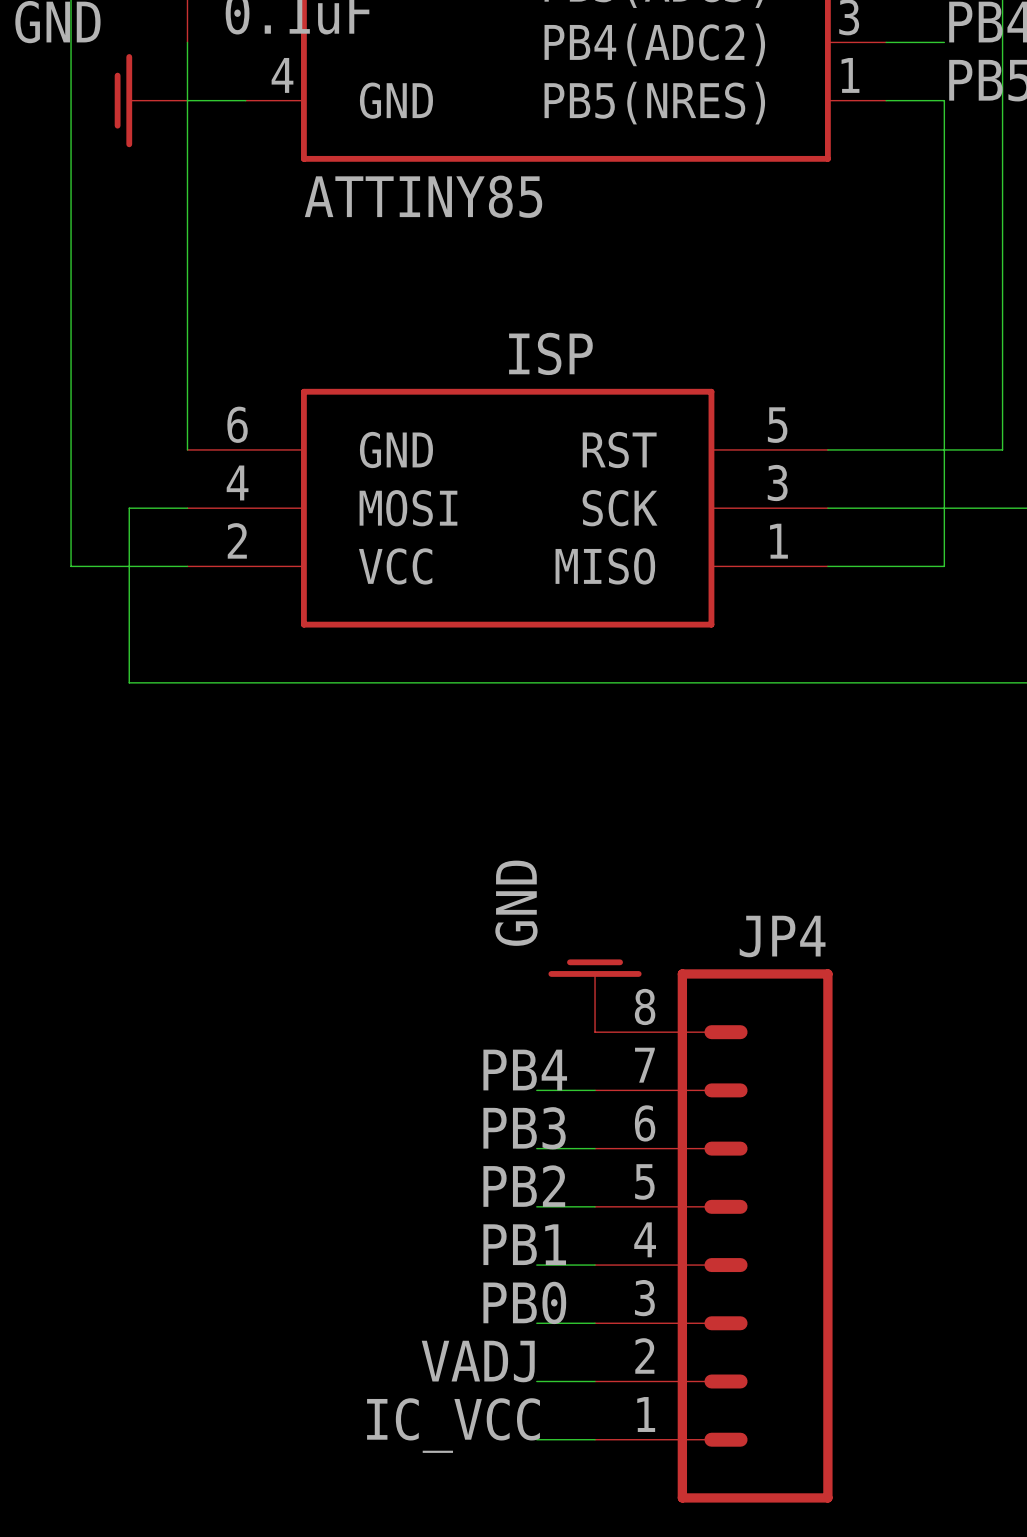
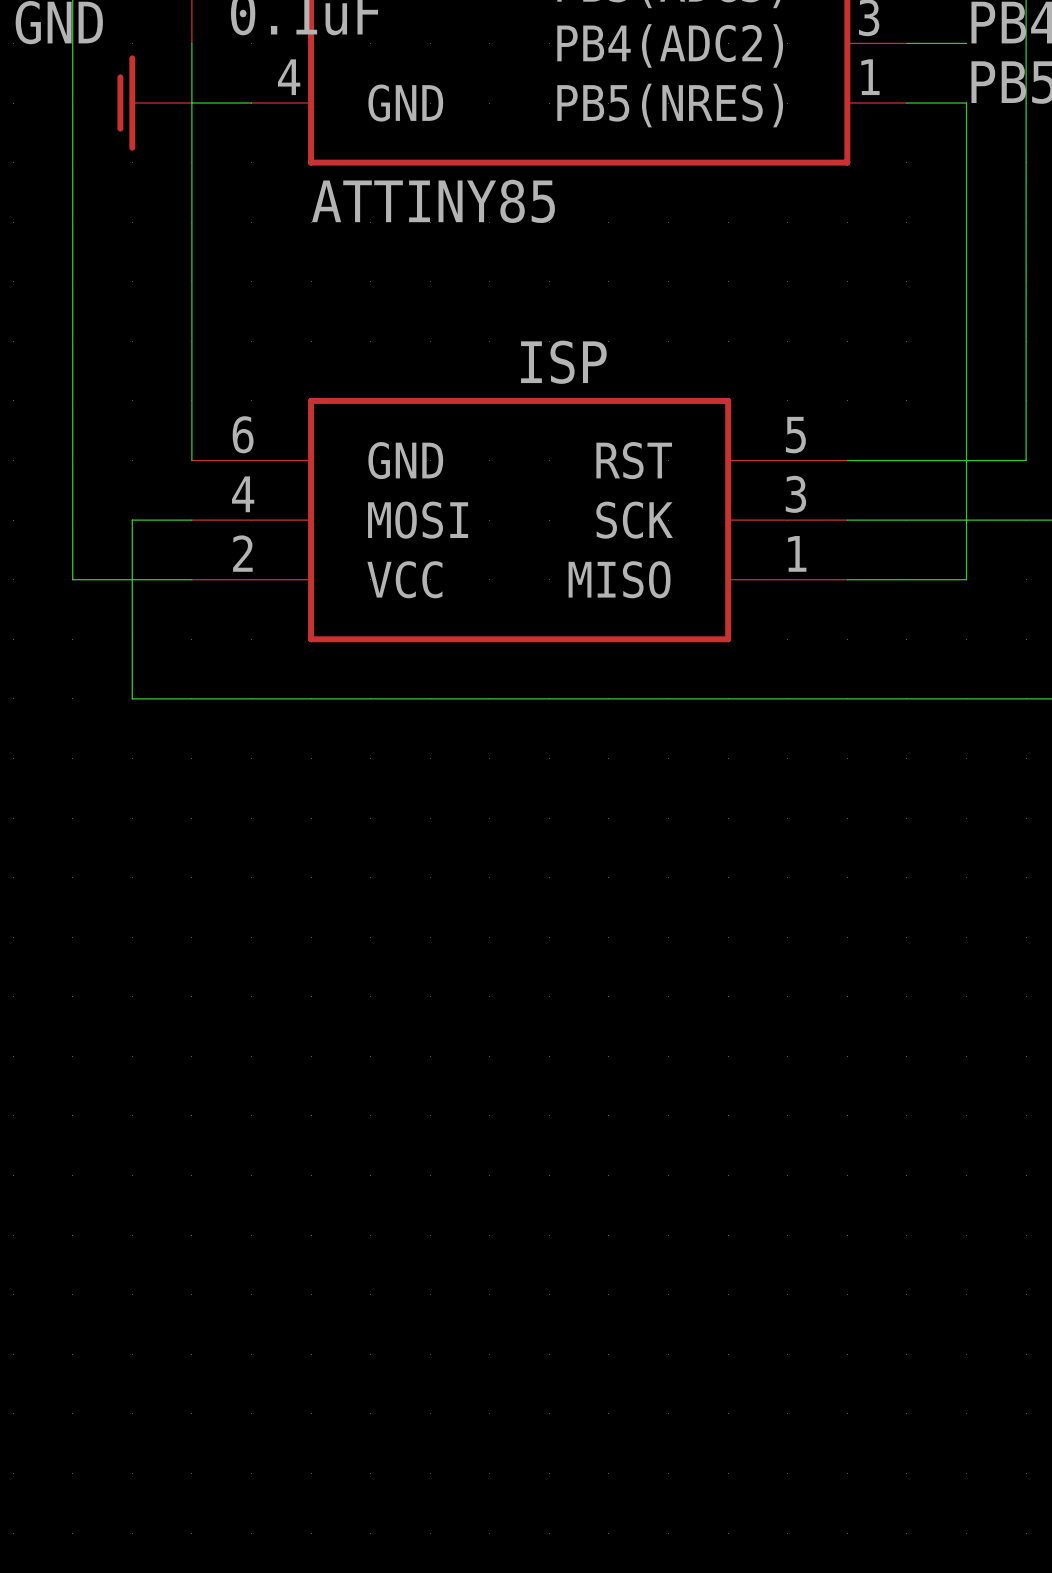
power symbol: GND (595, 995) -> none
label: PB4 (525, 1070) -> none
wire: (536, 1090) (595, 1090) -> none
label: PB3 (524, 1128) -> none
wire: (536, 1148) (595, 1148) -> none
label: PB2 (524, 1186) -> none
wire: (536, 1206) (595, 1206) -> none
JP4: (713, 1235) -> none
label: PB1 (524, 1244) -> none
wire: (536, 1265) (595, 1265) -> none
label: PB0 (524, 1302) -> none
wire: (536, 1323) (595, 1323) -> none
label: VADJ (478, 1361) -> none
wire: (536, 1381) (595, 1381) -> none
label: IC_VCC (453, 1425) -> none
wire: (536, 1439) (595, 1439) -> none

